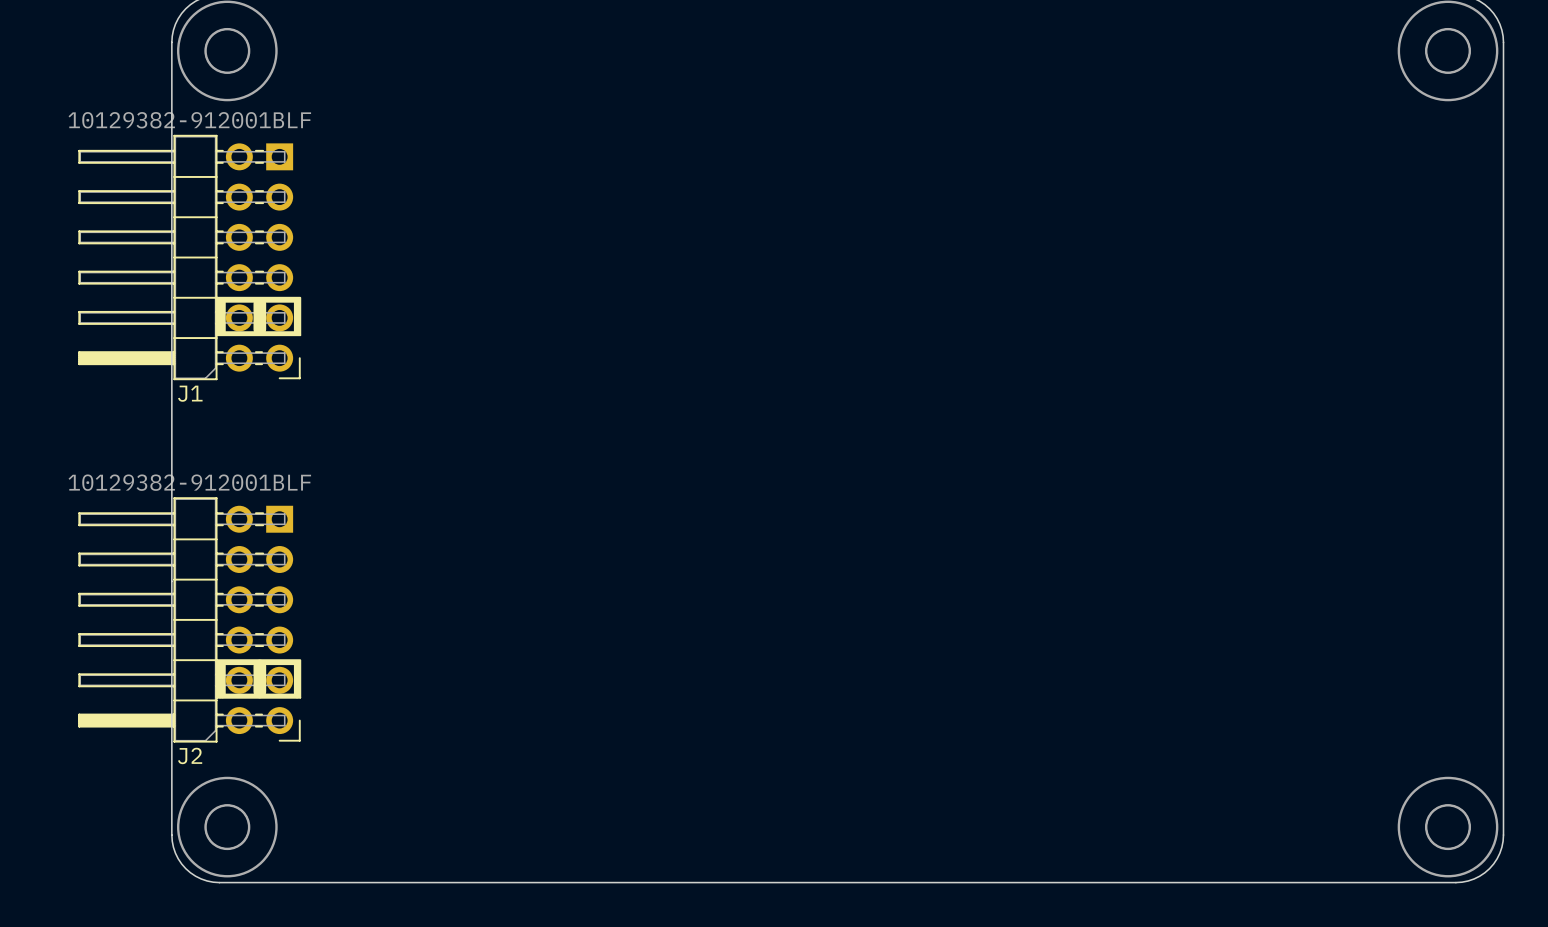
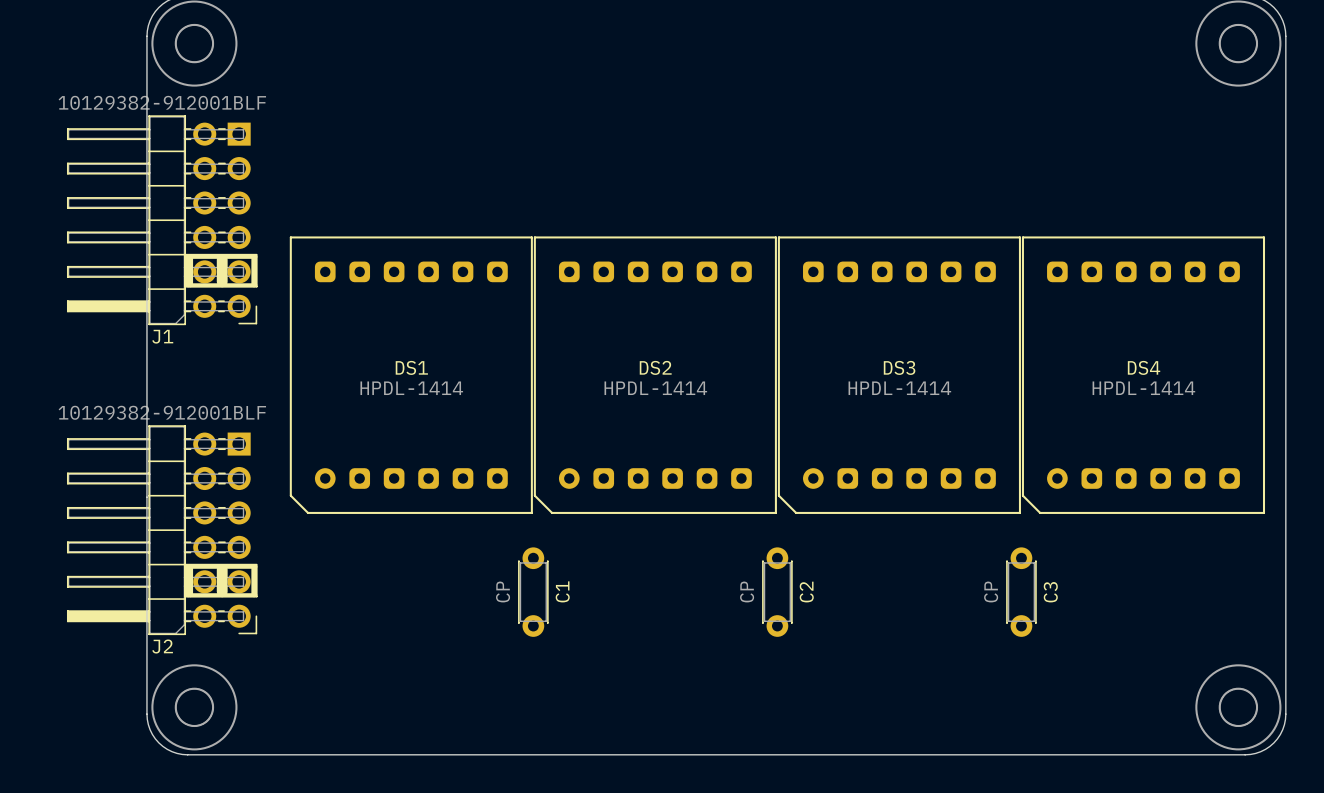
DS1: none -> HPDL-1414 (411, 375)
DS2: none -> HPDL-1414 (655, 375)
DS3: none -> HPDL-1414 (899, 375)
DS4: none -> HPDL-1414 (1143, 375)
C1: none -> CP (533, 592)
C2: none -> CP (777, 592)
C3: none -> CP (1021, 592)

